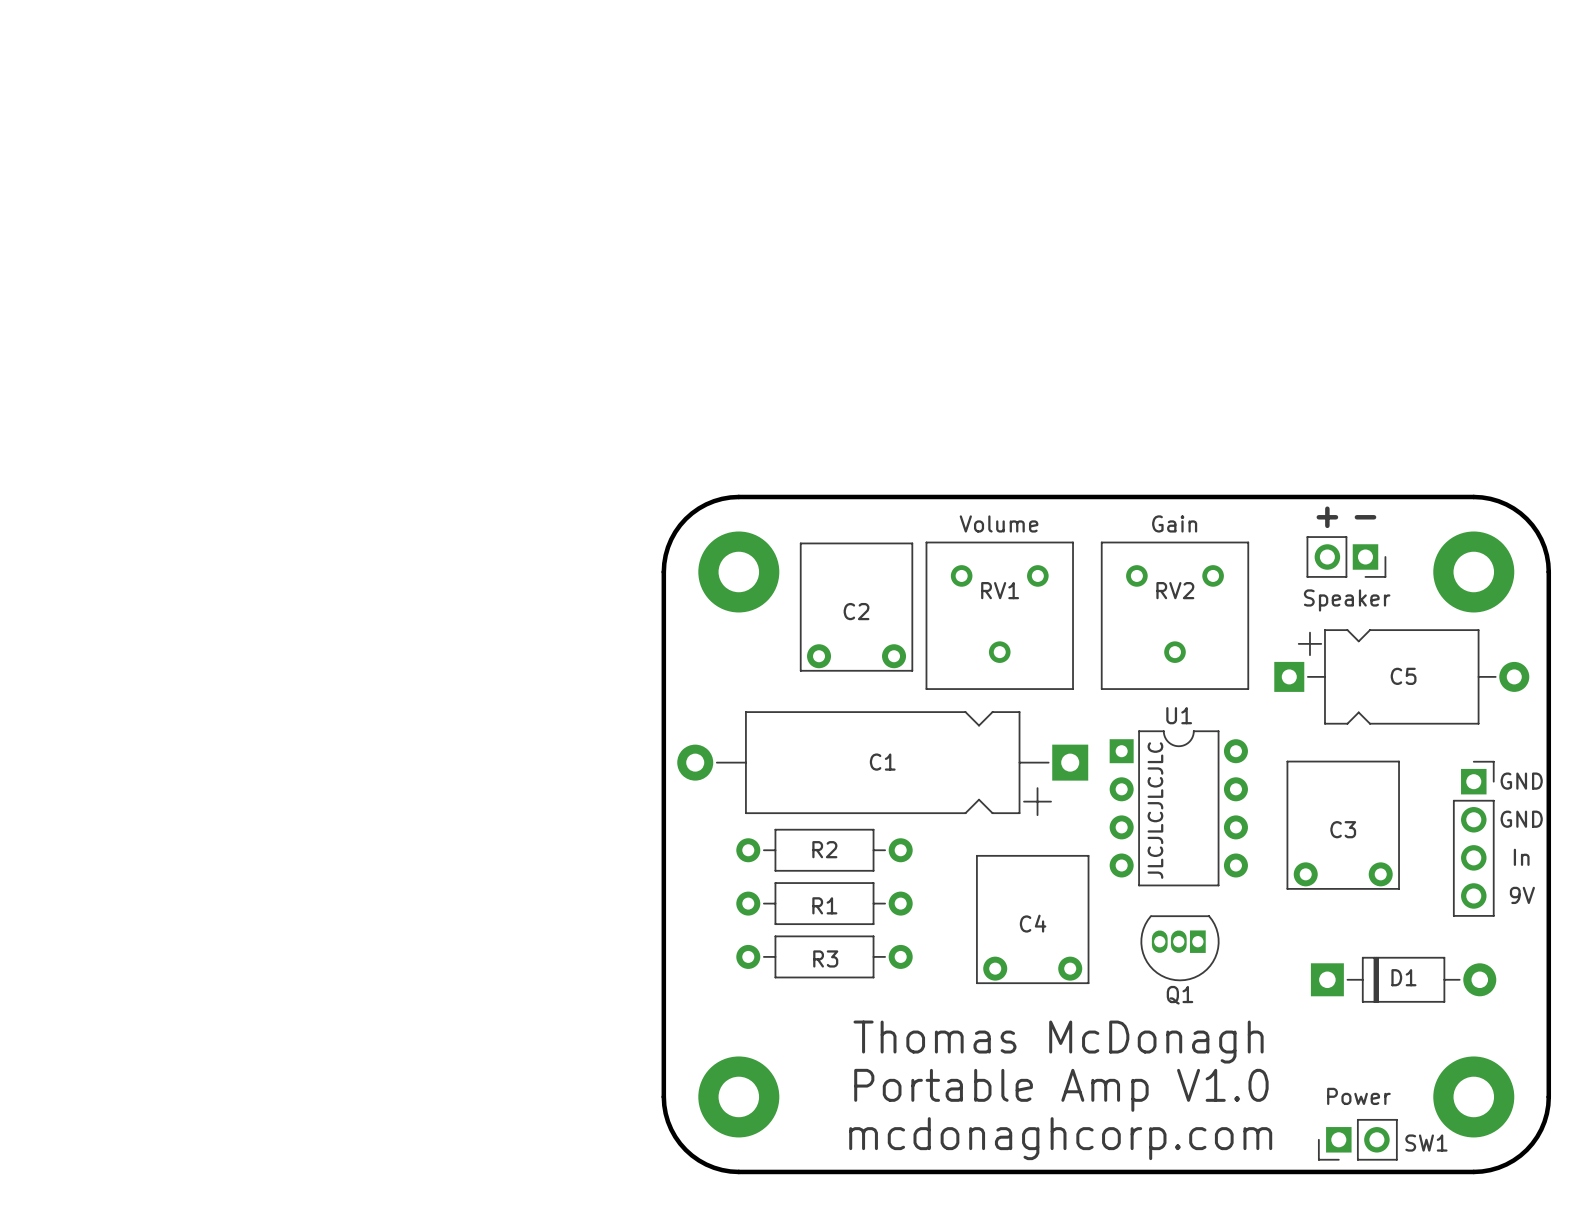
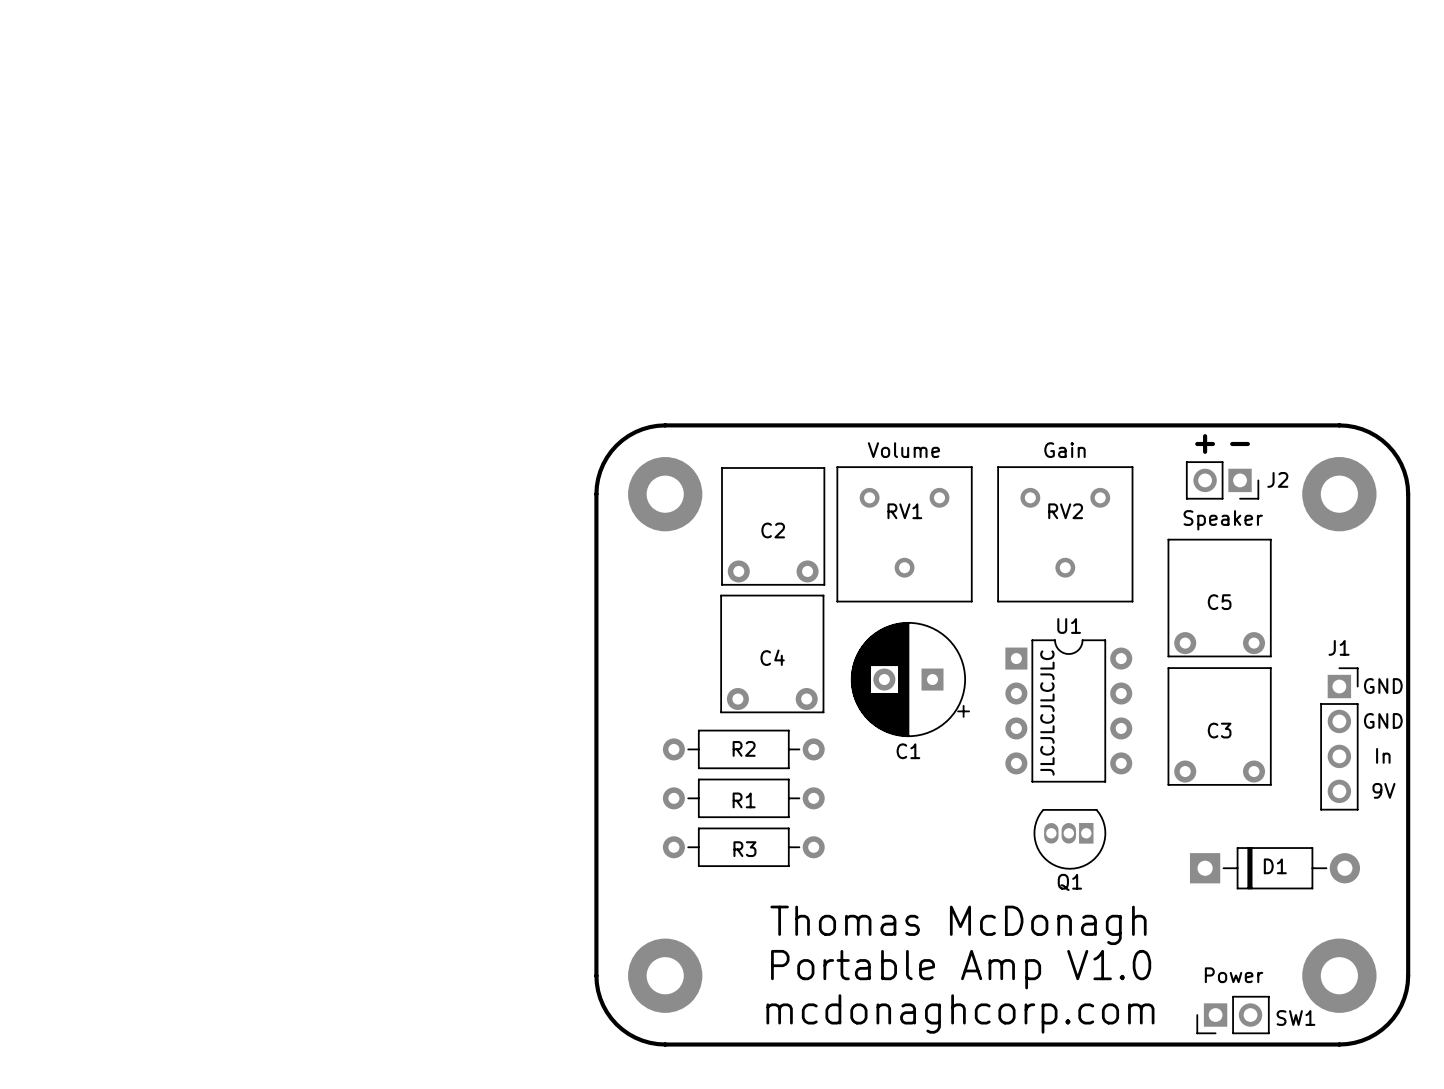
J2 name: none -> J2 (1277, 479)
C5 footprint: [1274, 629, 1530, 725] -> [1167, 538, 1272, 658]
C1 footprint: [677, 711, 1089, 817] -> [850, 622, 970, 738]
J1 name: none -> J1 (1339, 647)
C1 name position: C1 (882, 762) -> C1 (908, 751)
C4 position: (1032, 919) -> (772, 653)

